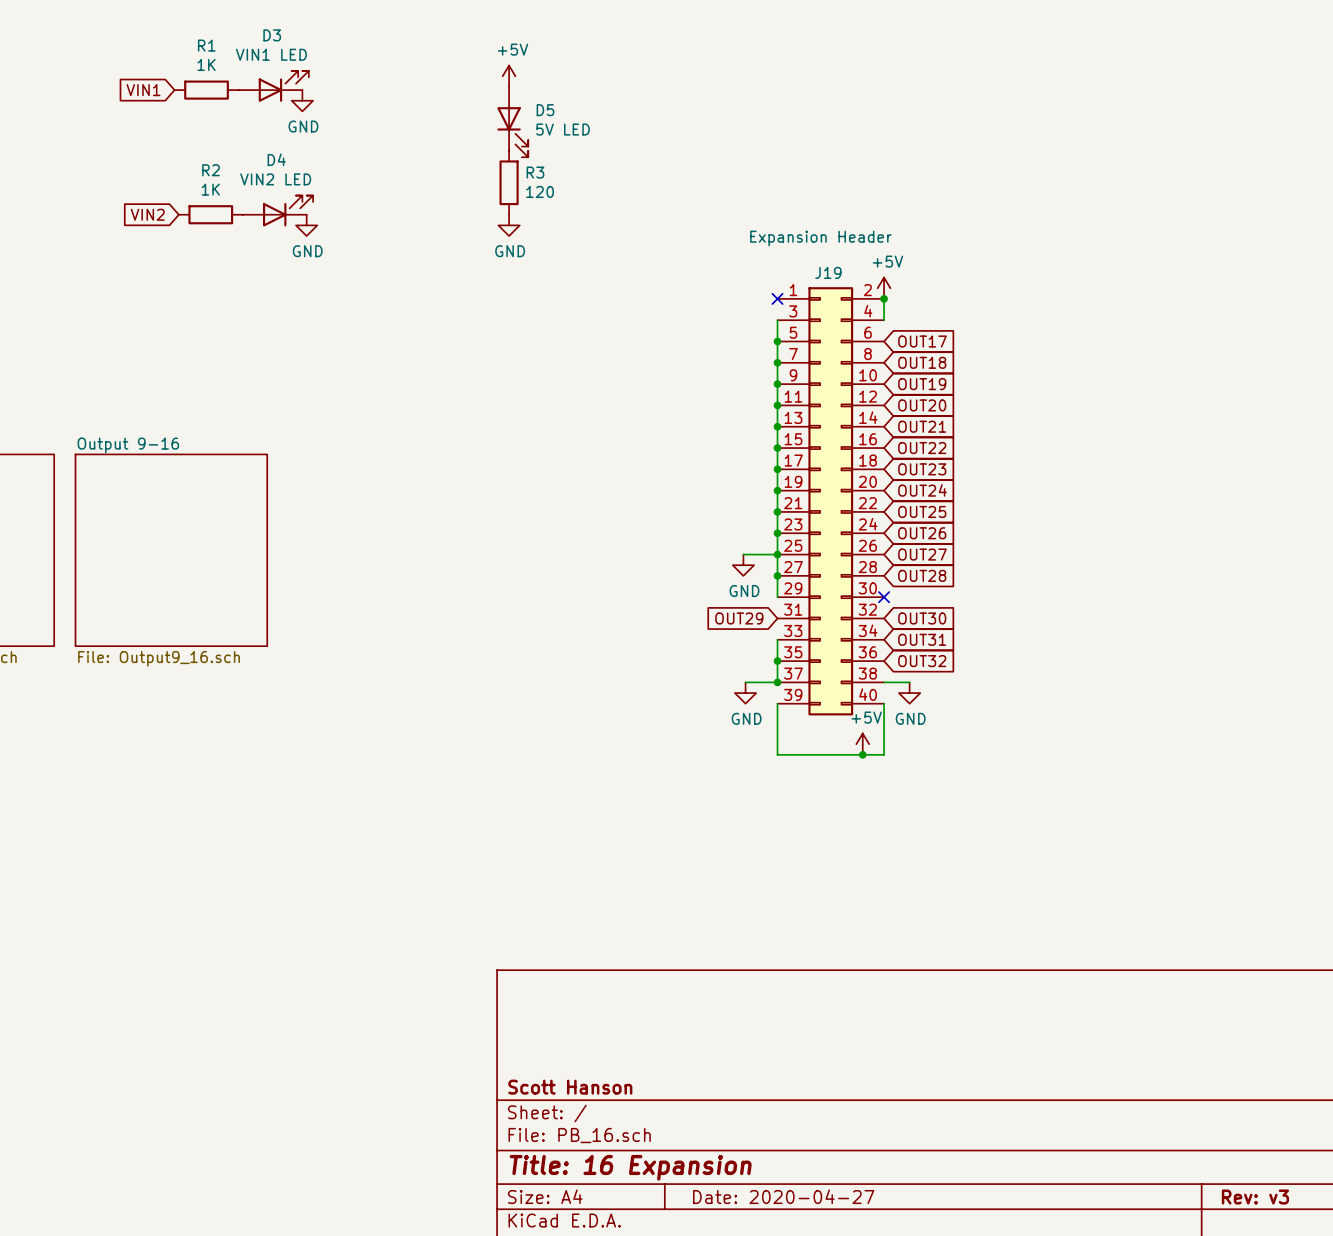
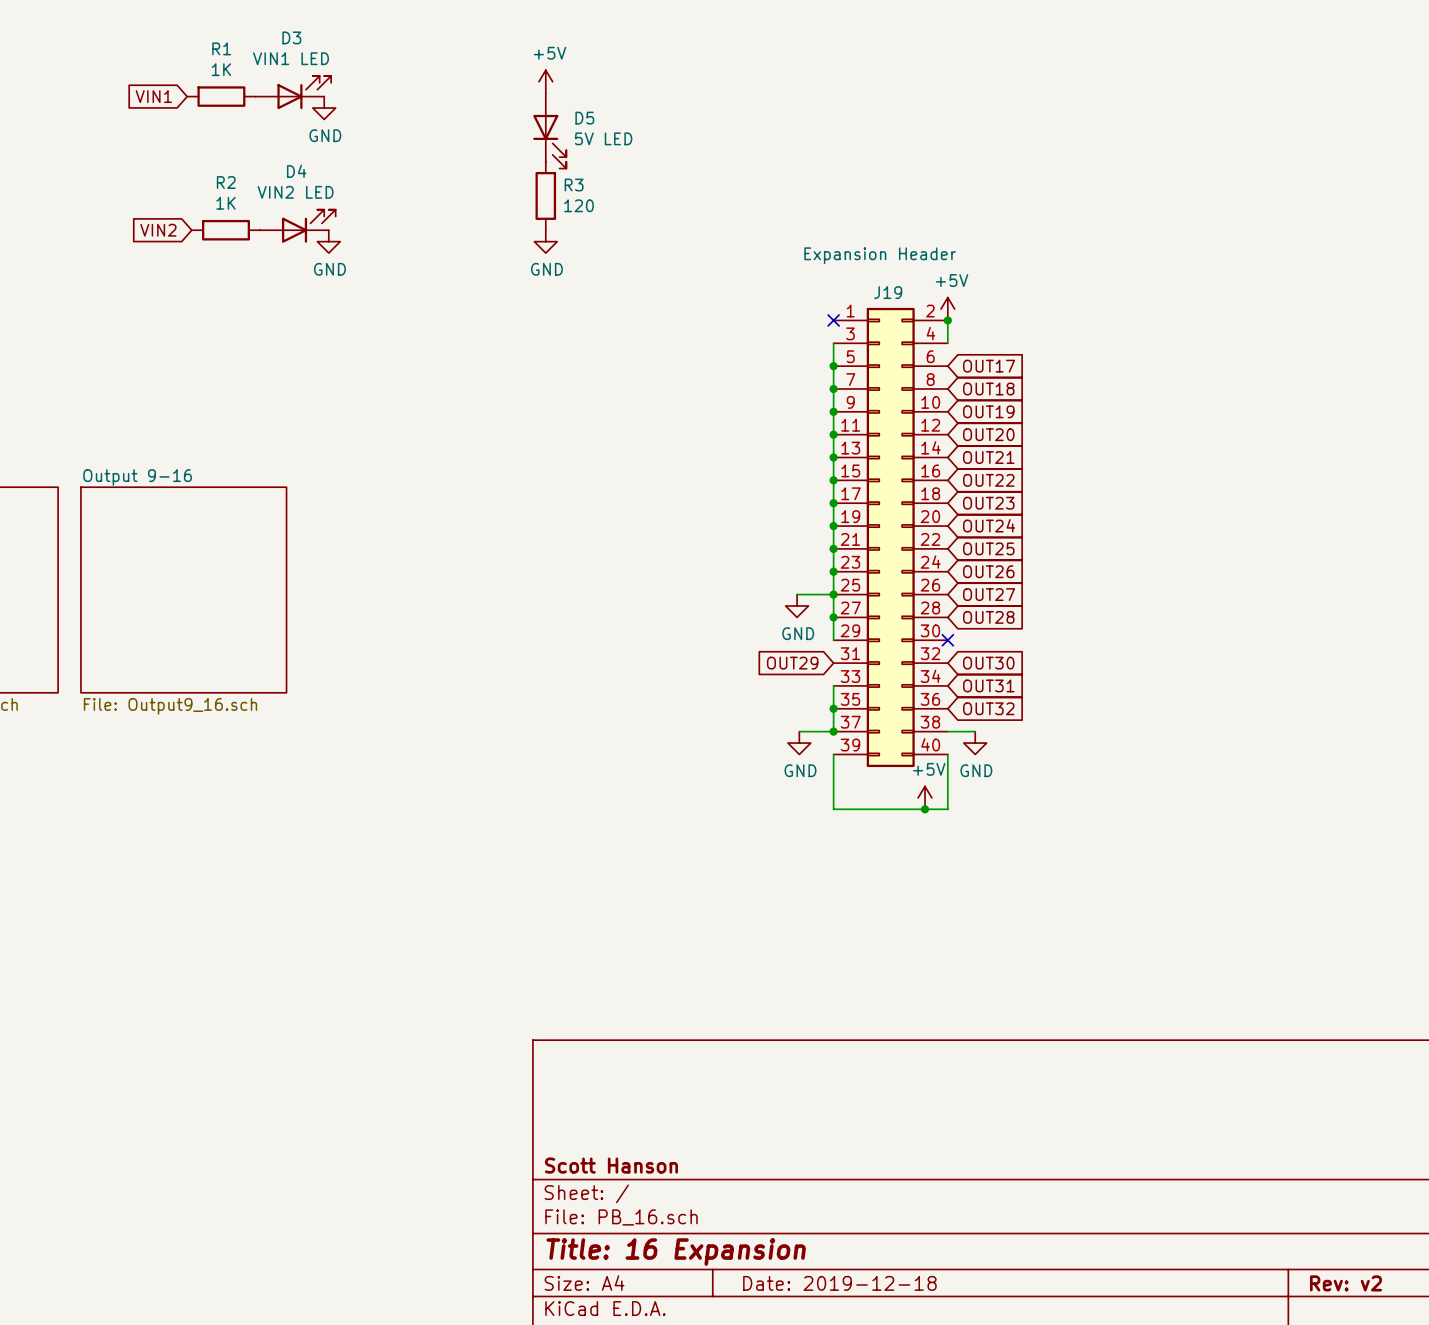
title block: Date: 2020-04-27 (783, 1196) -> Date: 2019-12-18 (839, 1283)
title block: Rev: v3 (1255, 1197) -> Rev: v2 (1346, 1283)

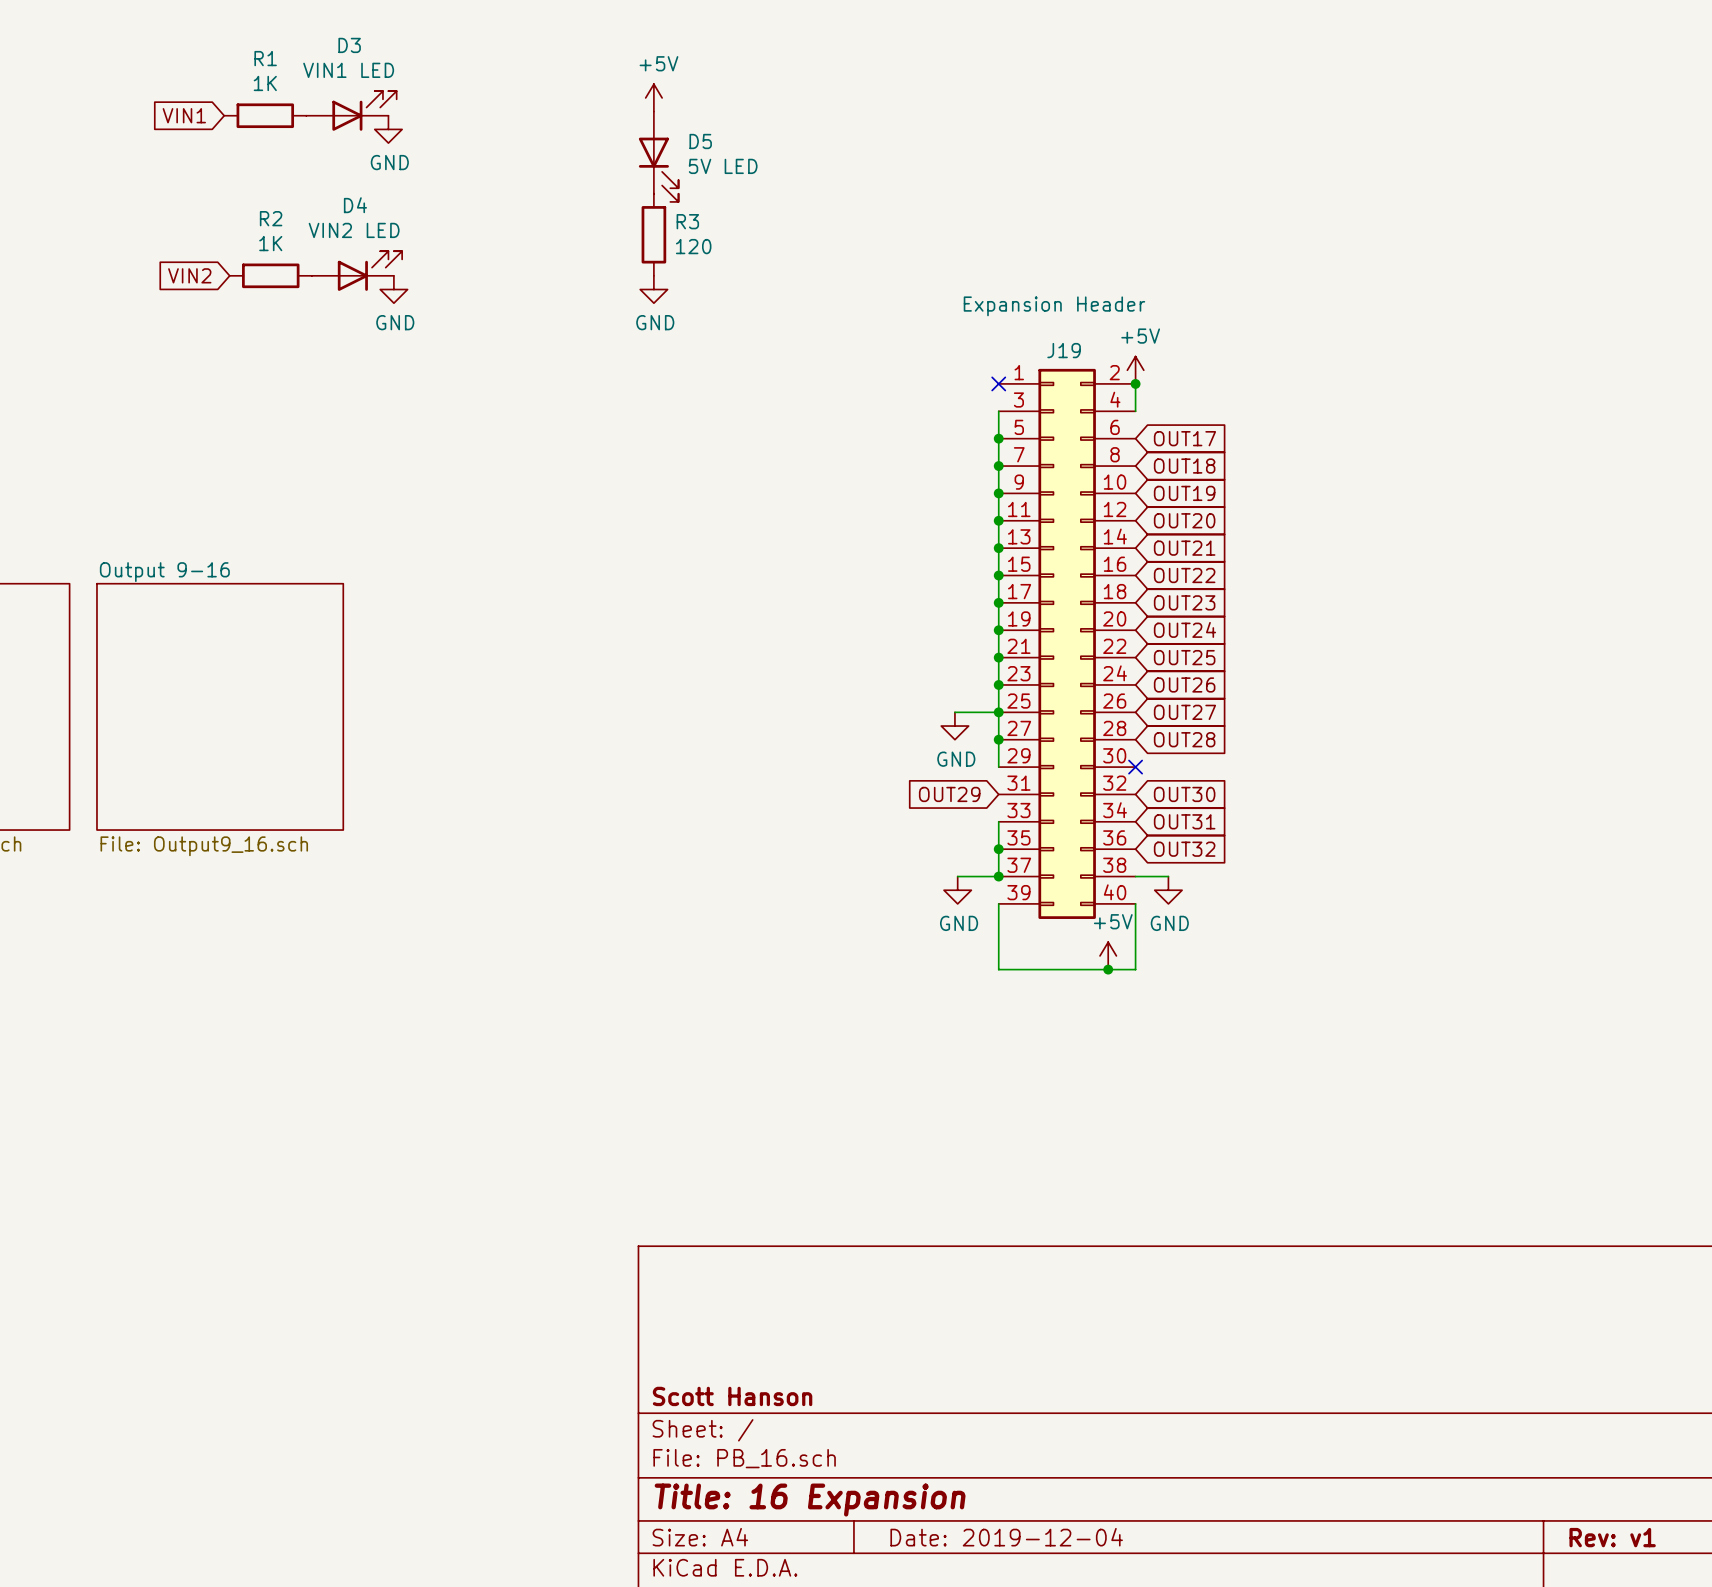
title block: Date: 2019-12-18 (839, 1283) -> Date: 2019-12-04 (1006, 1537)
title block: Rev: v2 (1346, 1283) -> Rev: v1 (1612, 1537)

